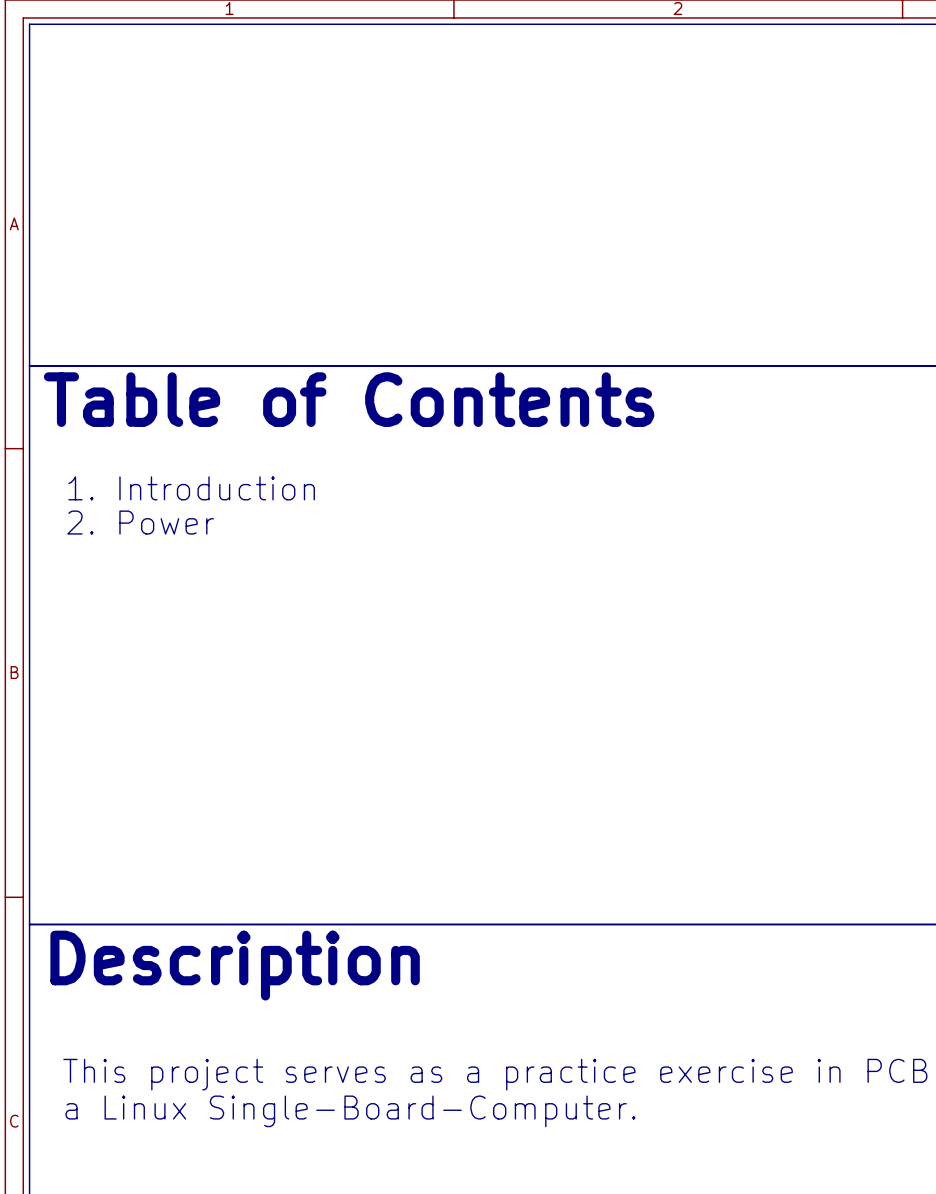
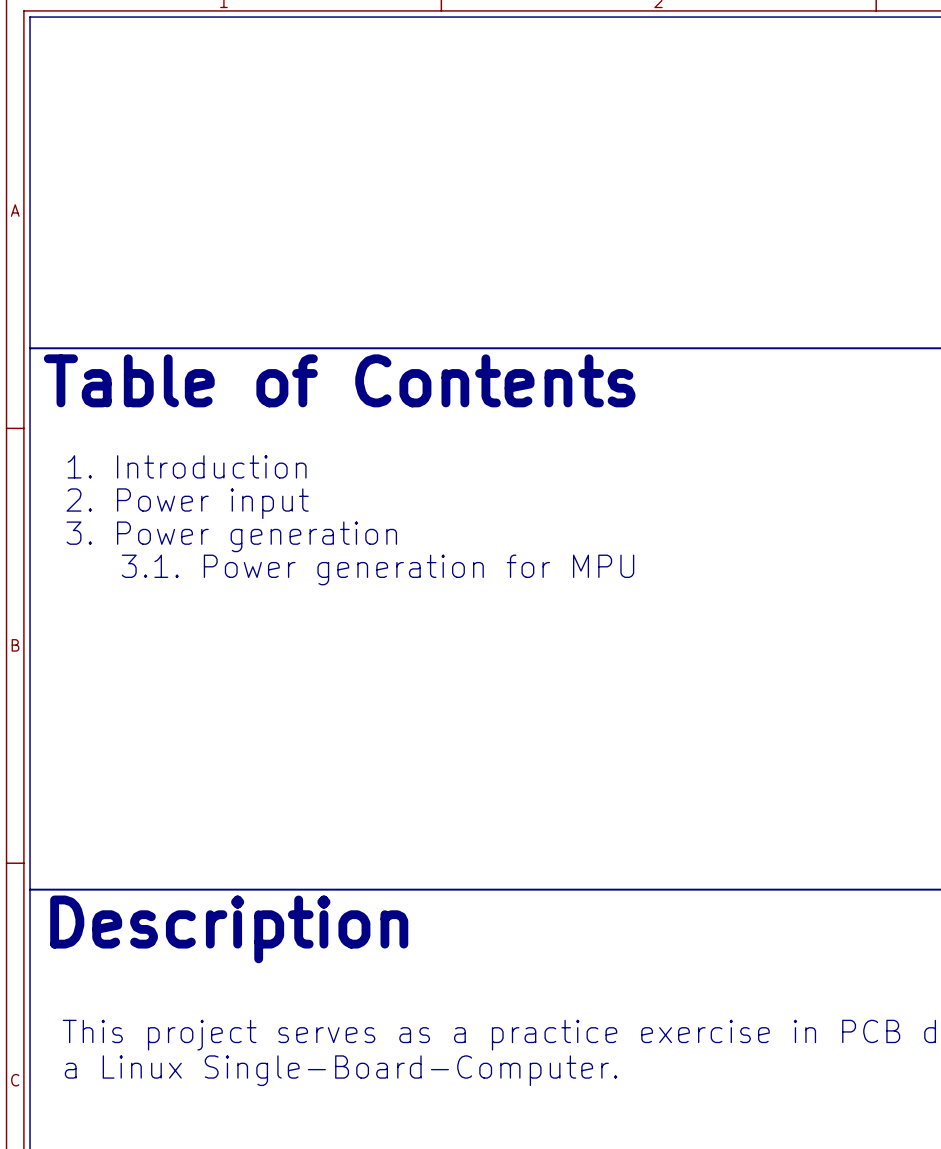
text: 2. Power (140, 522) -> 2. Power input (187, 503)
text: none -> 3. Power generation (231, 536)
text: none -> 3.1. Power generation for MPU (377, 569)

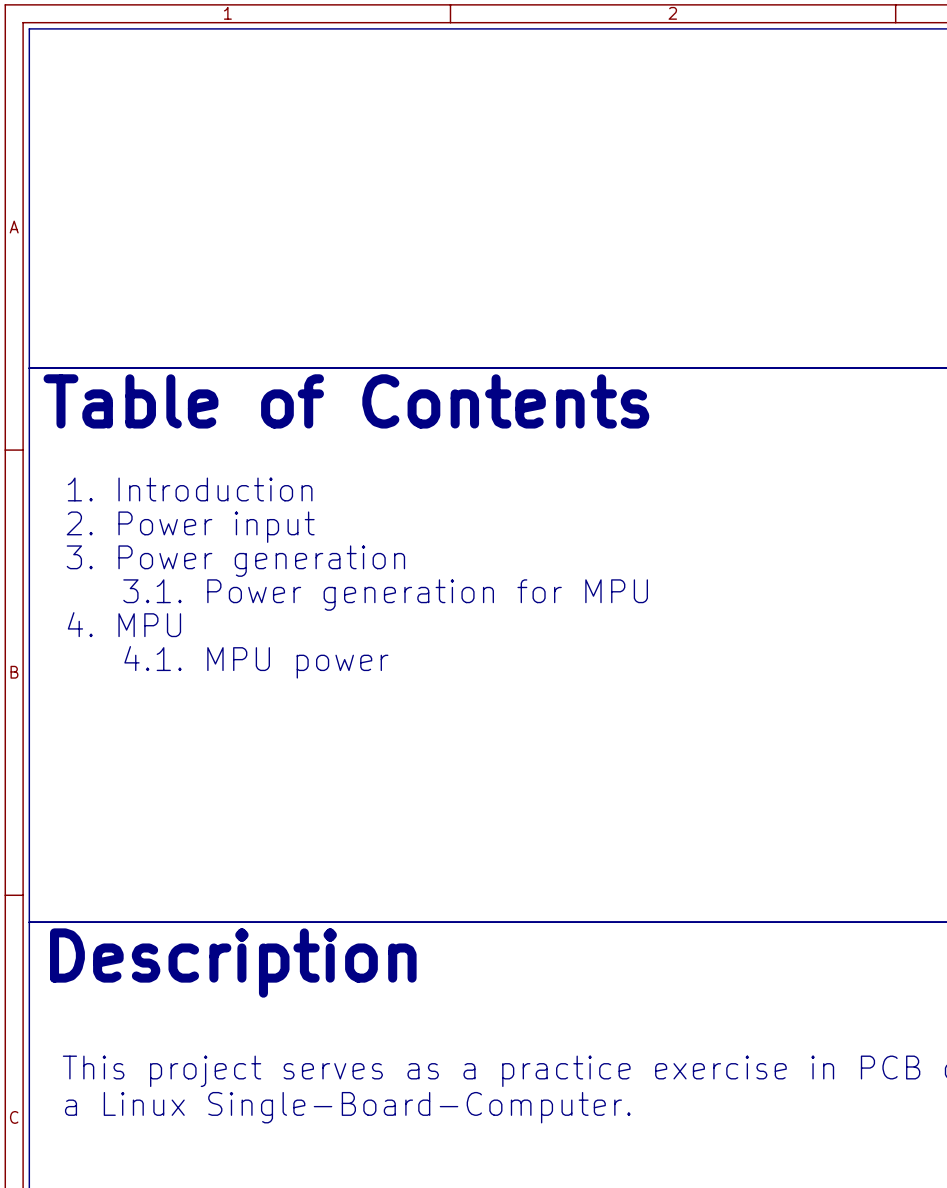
text: none -> 4. MPU (124, 624)
text: none -> 4.1. MPU power (256, 662)

